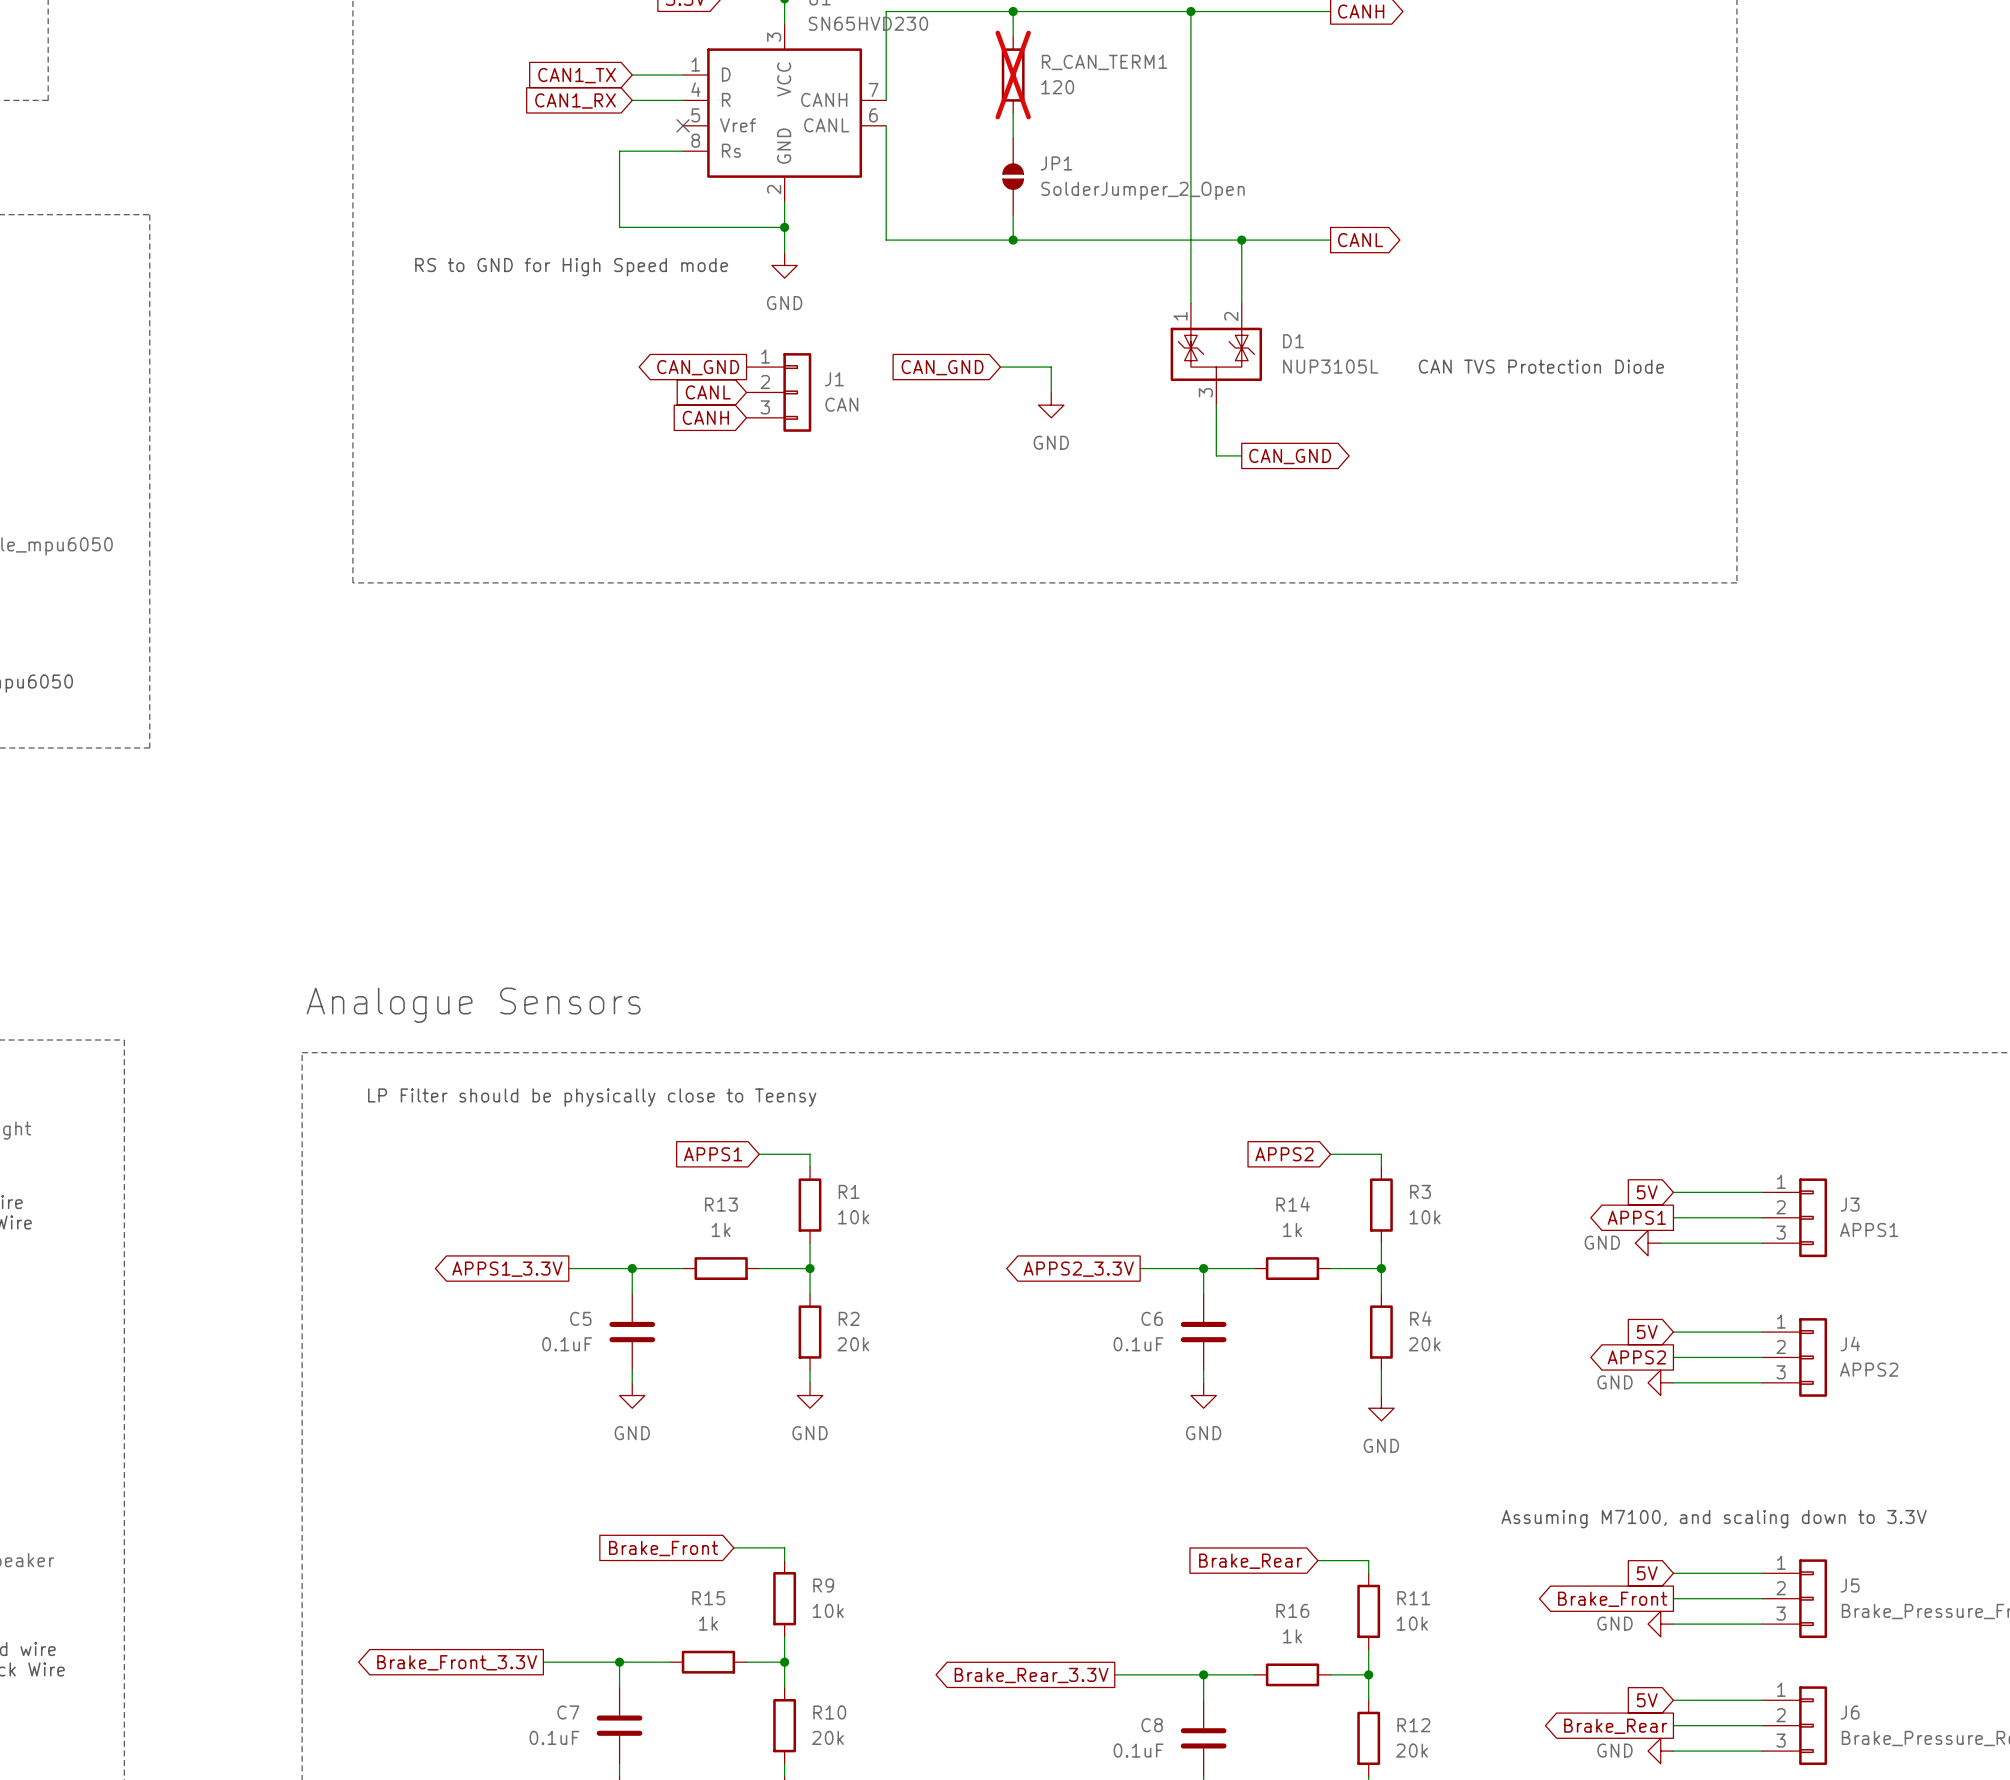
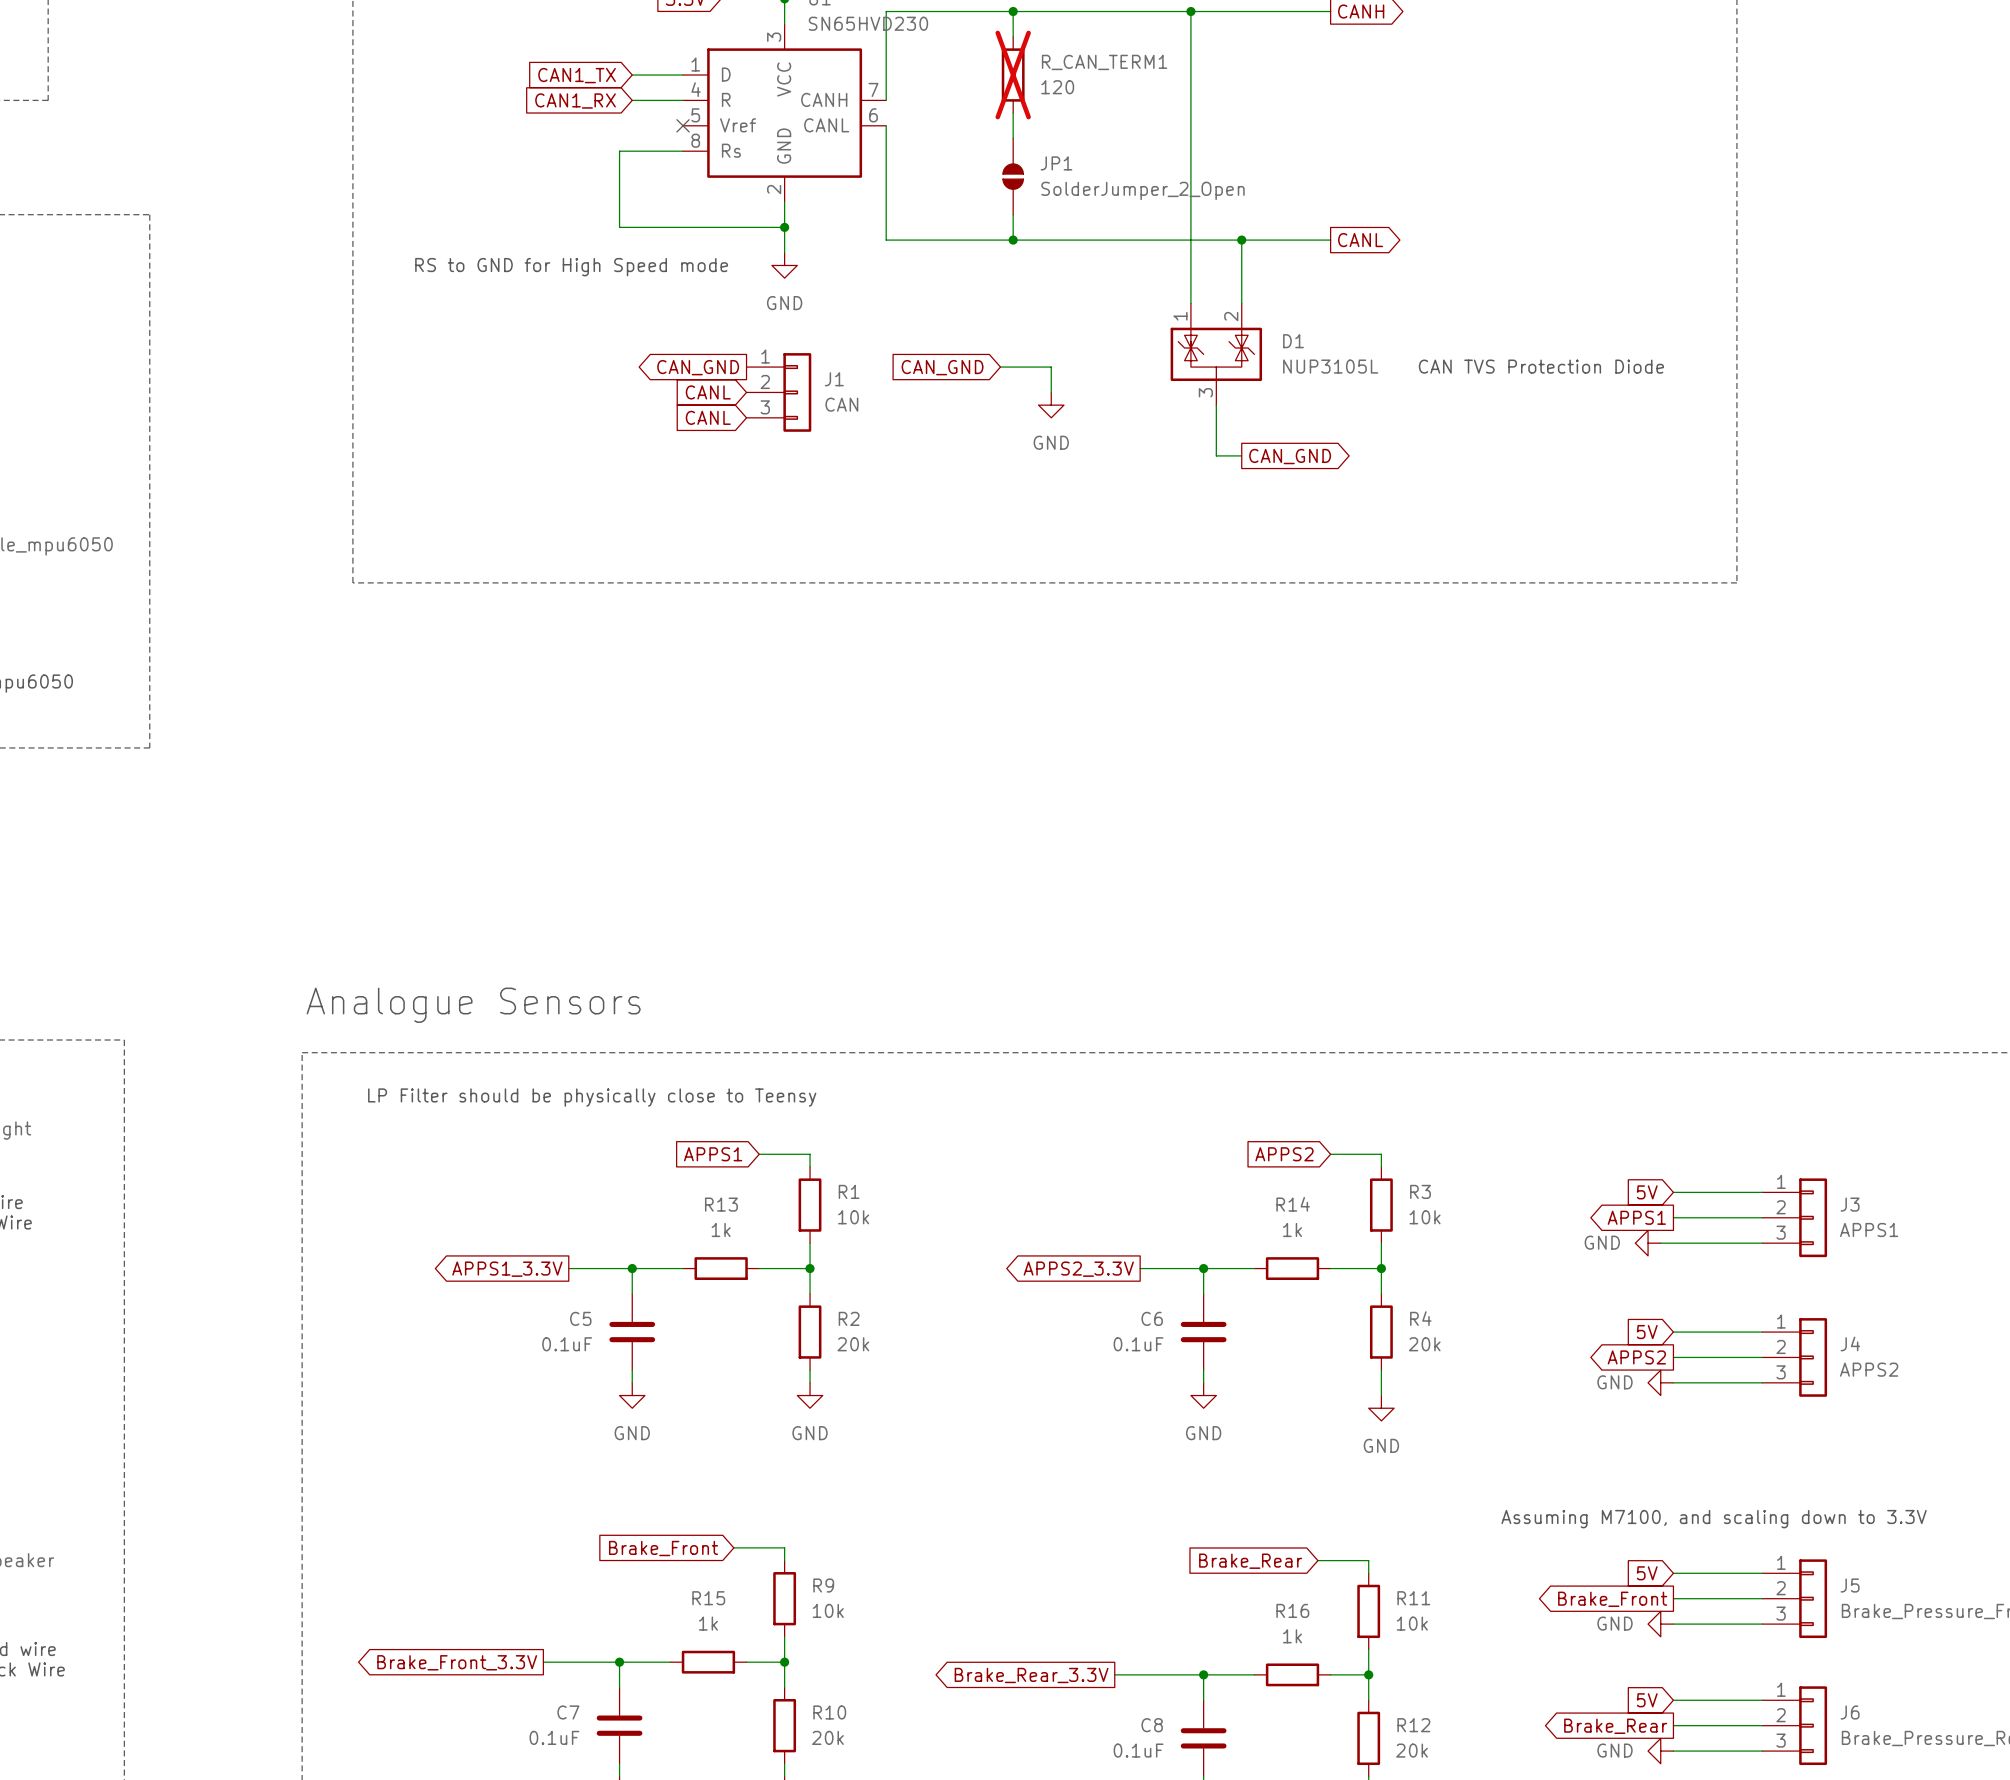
global label: CANH (705, 417) -> CANL (708, 417)

